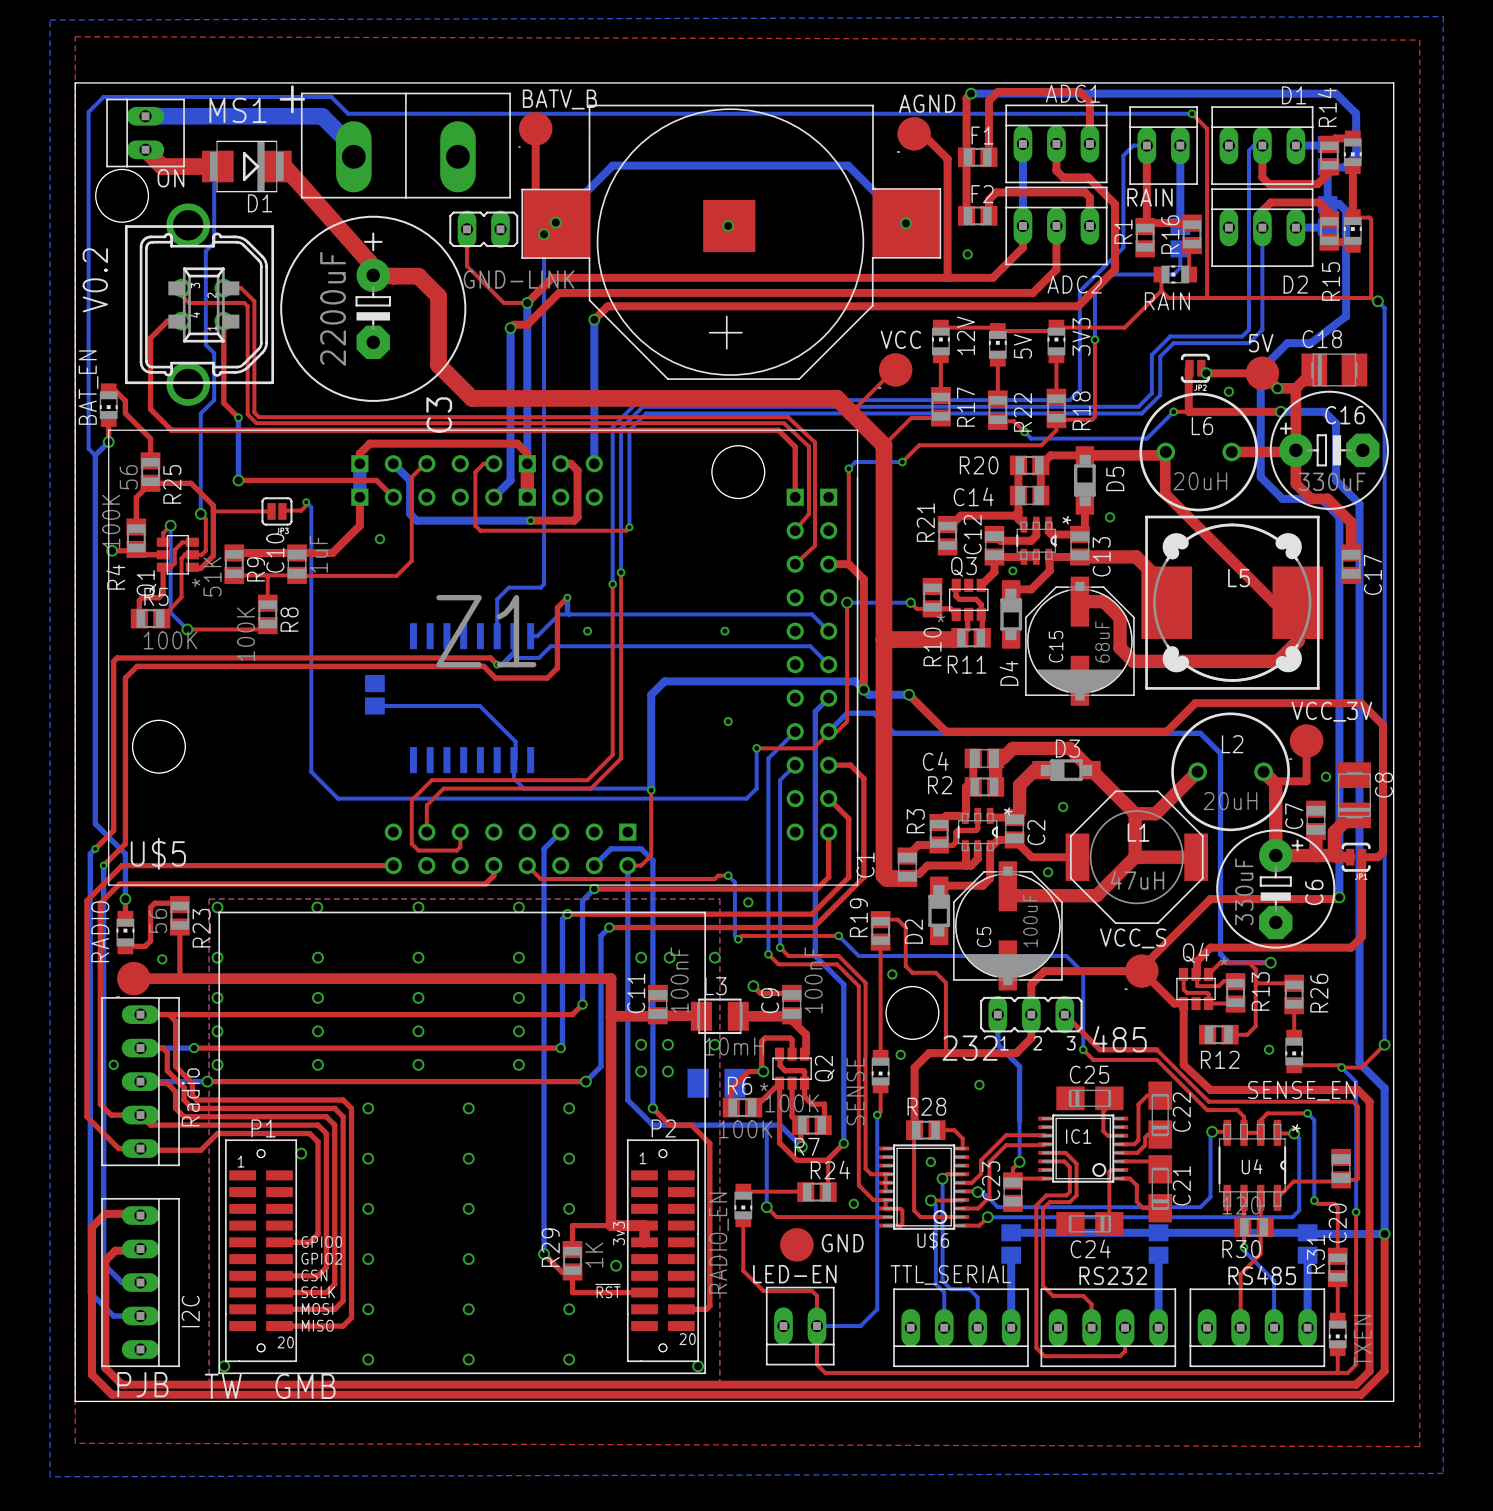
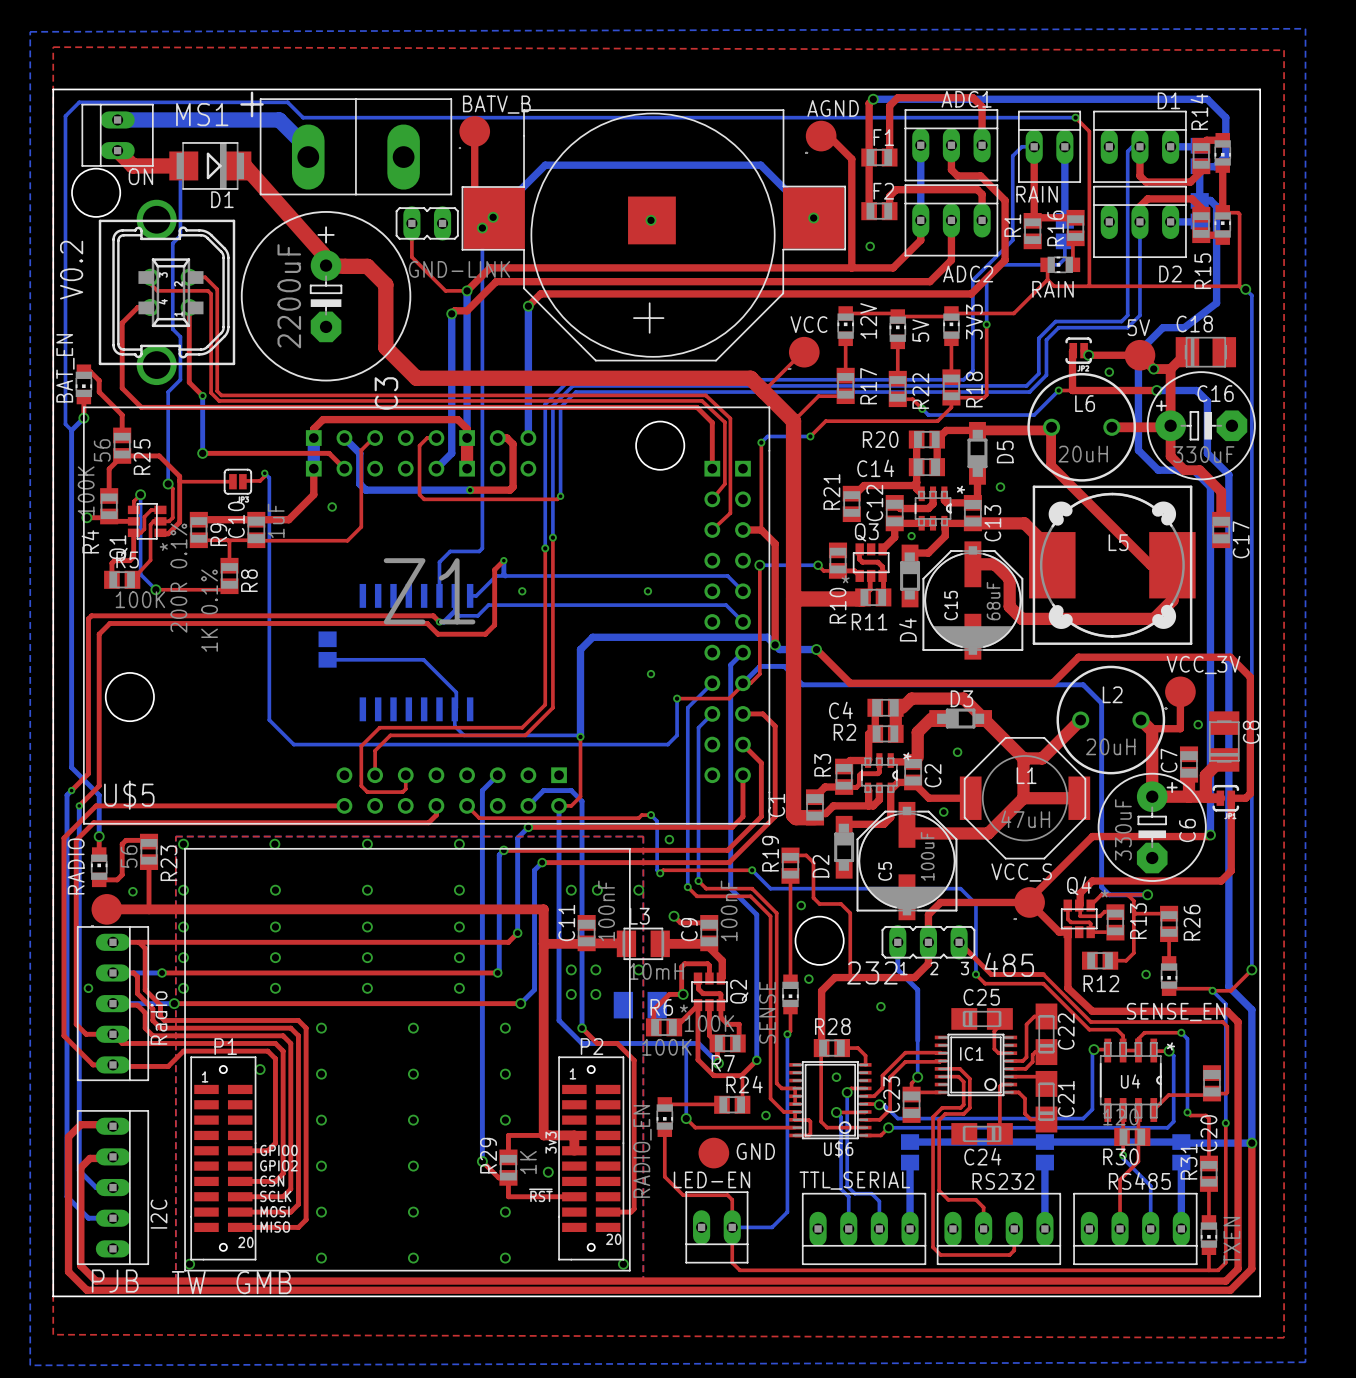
R9 value: 51K (212, 576) -> 200R 0.1% (178, 578)
R8 value: 100K (246, 634) -> 1K 0.1% (209, 610)

